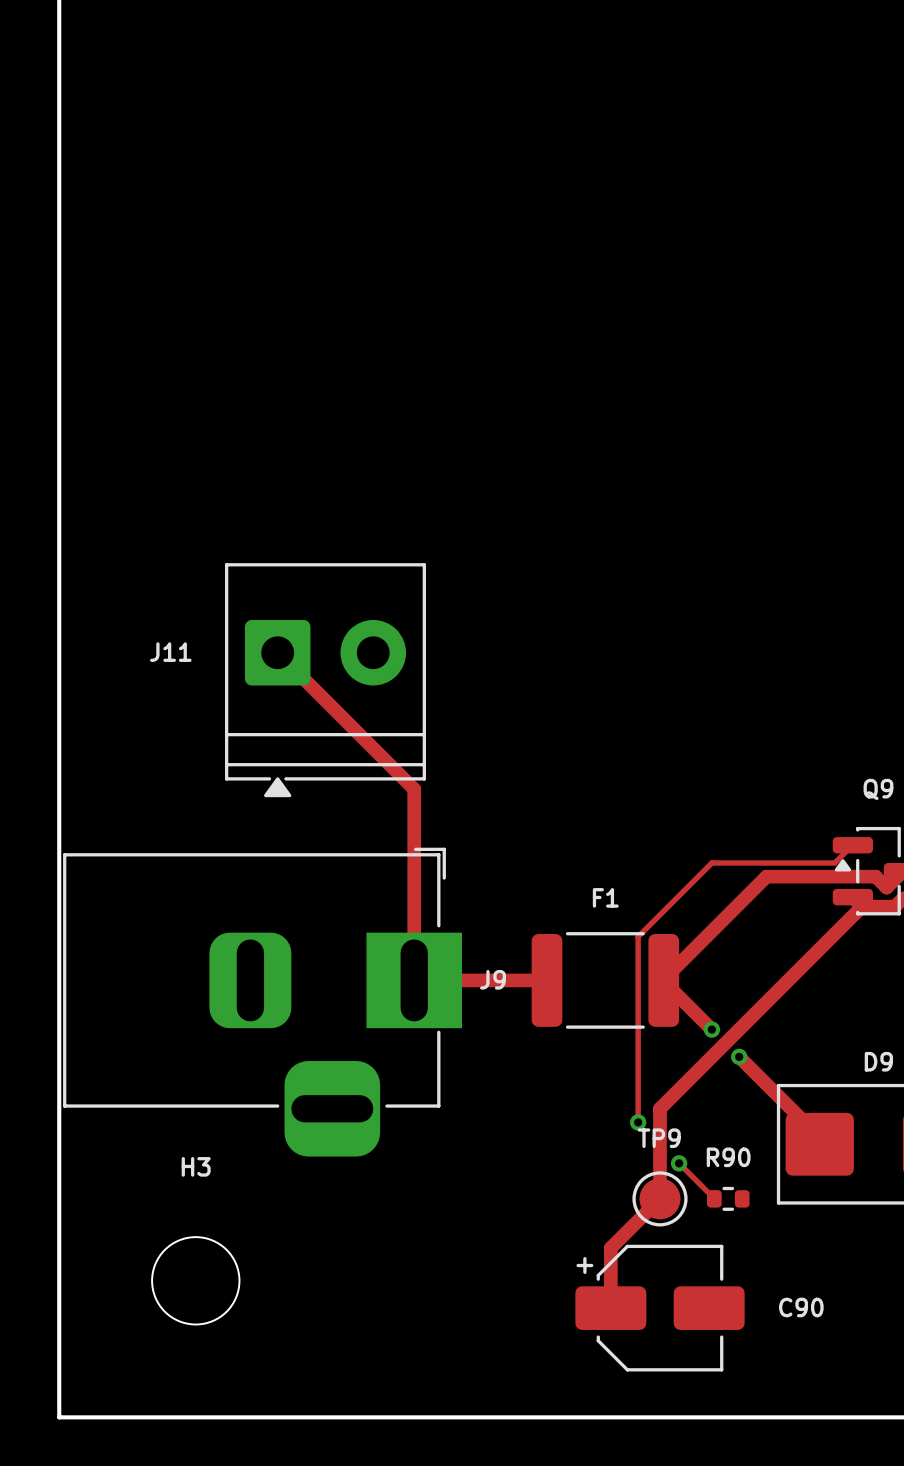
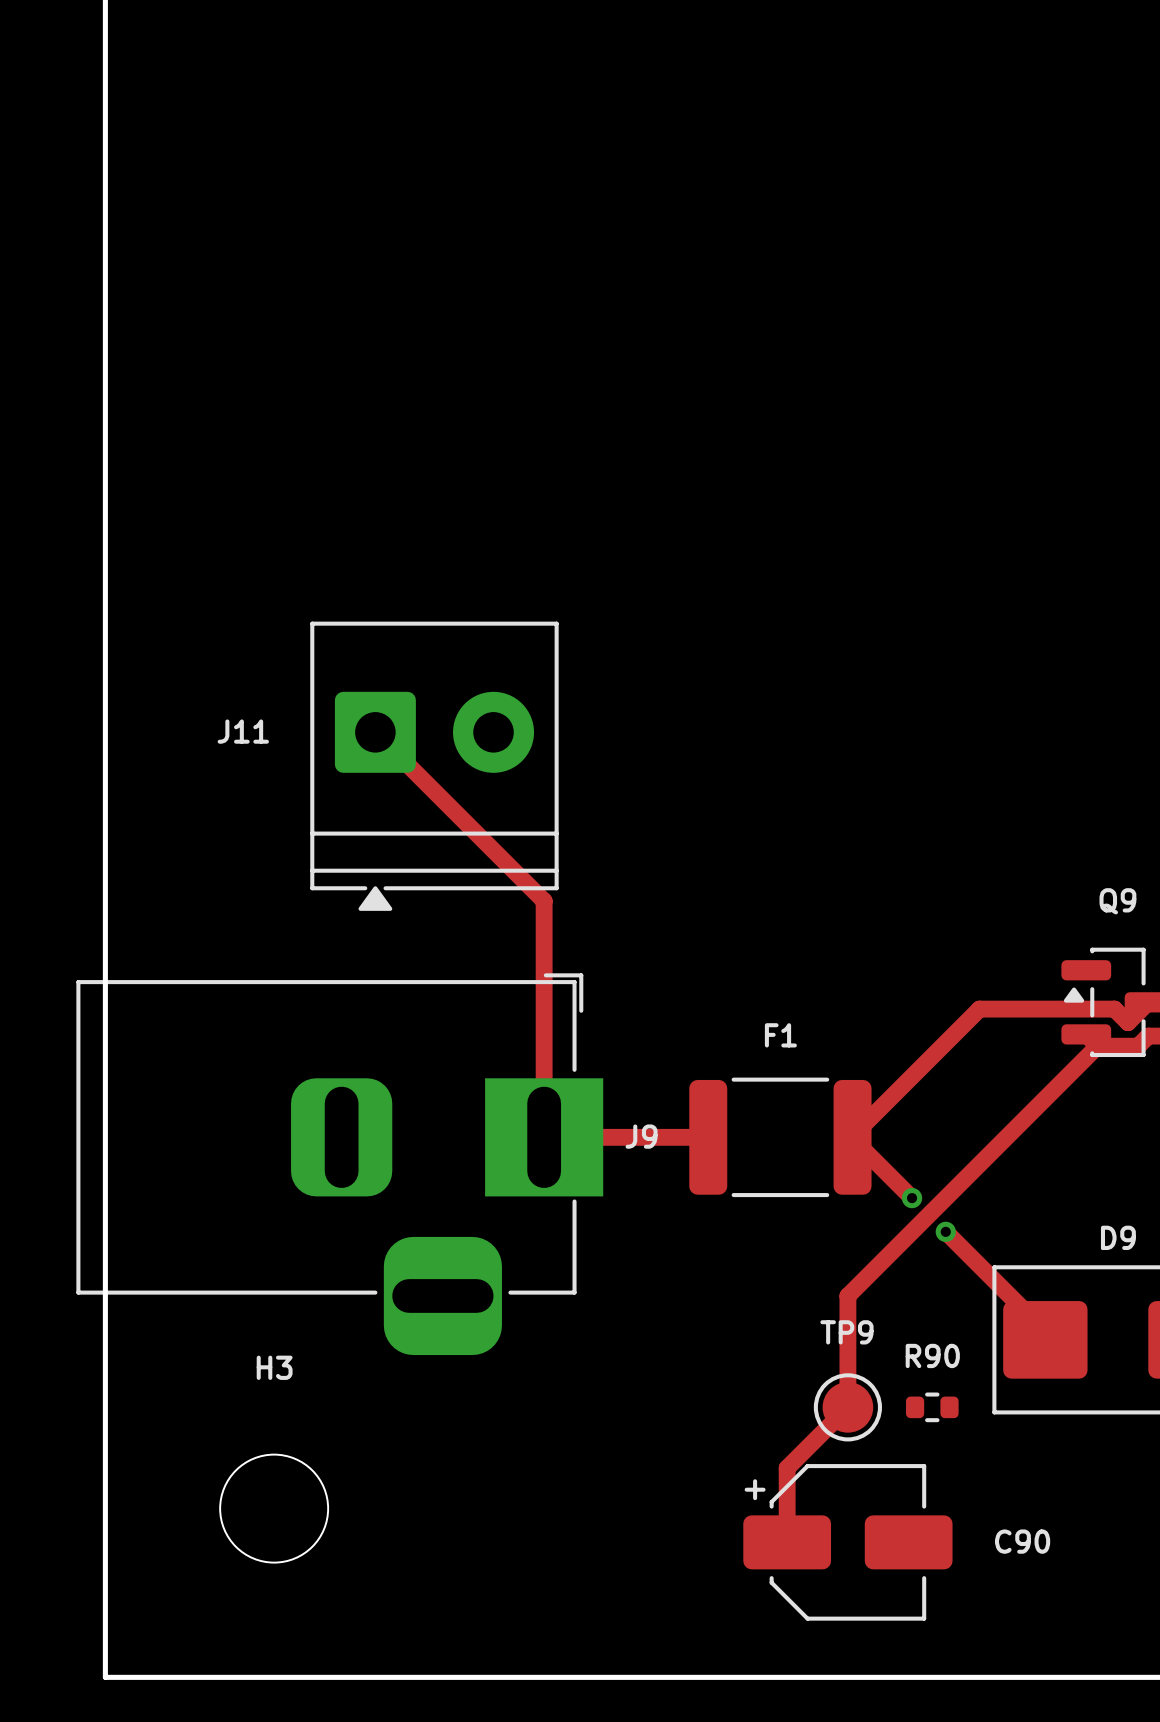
track: (852, 845) (853, 843) (834, 863) (711, 863) (638, 936) (638, 1122) -> none
J9 footprint: [63, 847, 463, 1157] -> [76, 973, 604, 1356]
via: (638, 1122) -> none
track: (679, 1163) (714, 1198) -> none
via: (679, 1163) -> none

